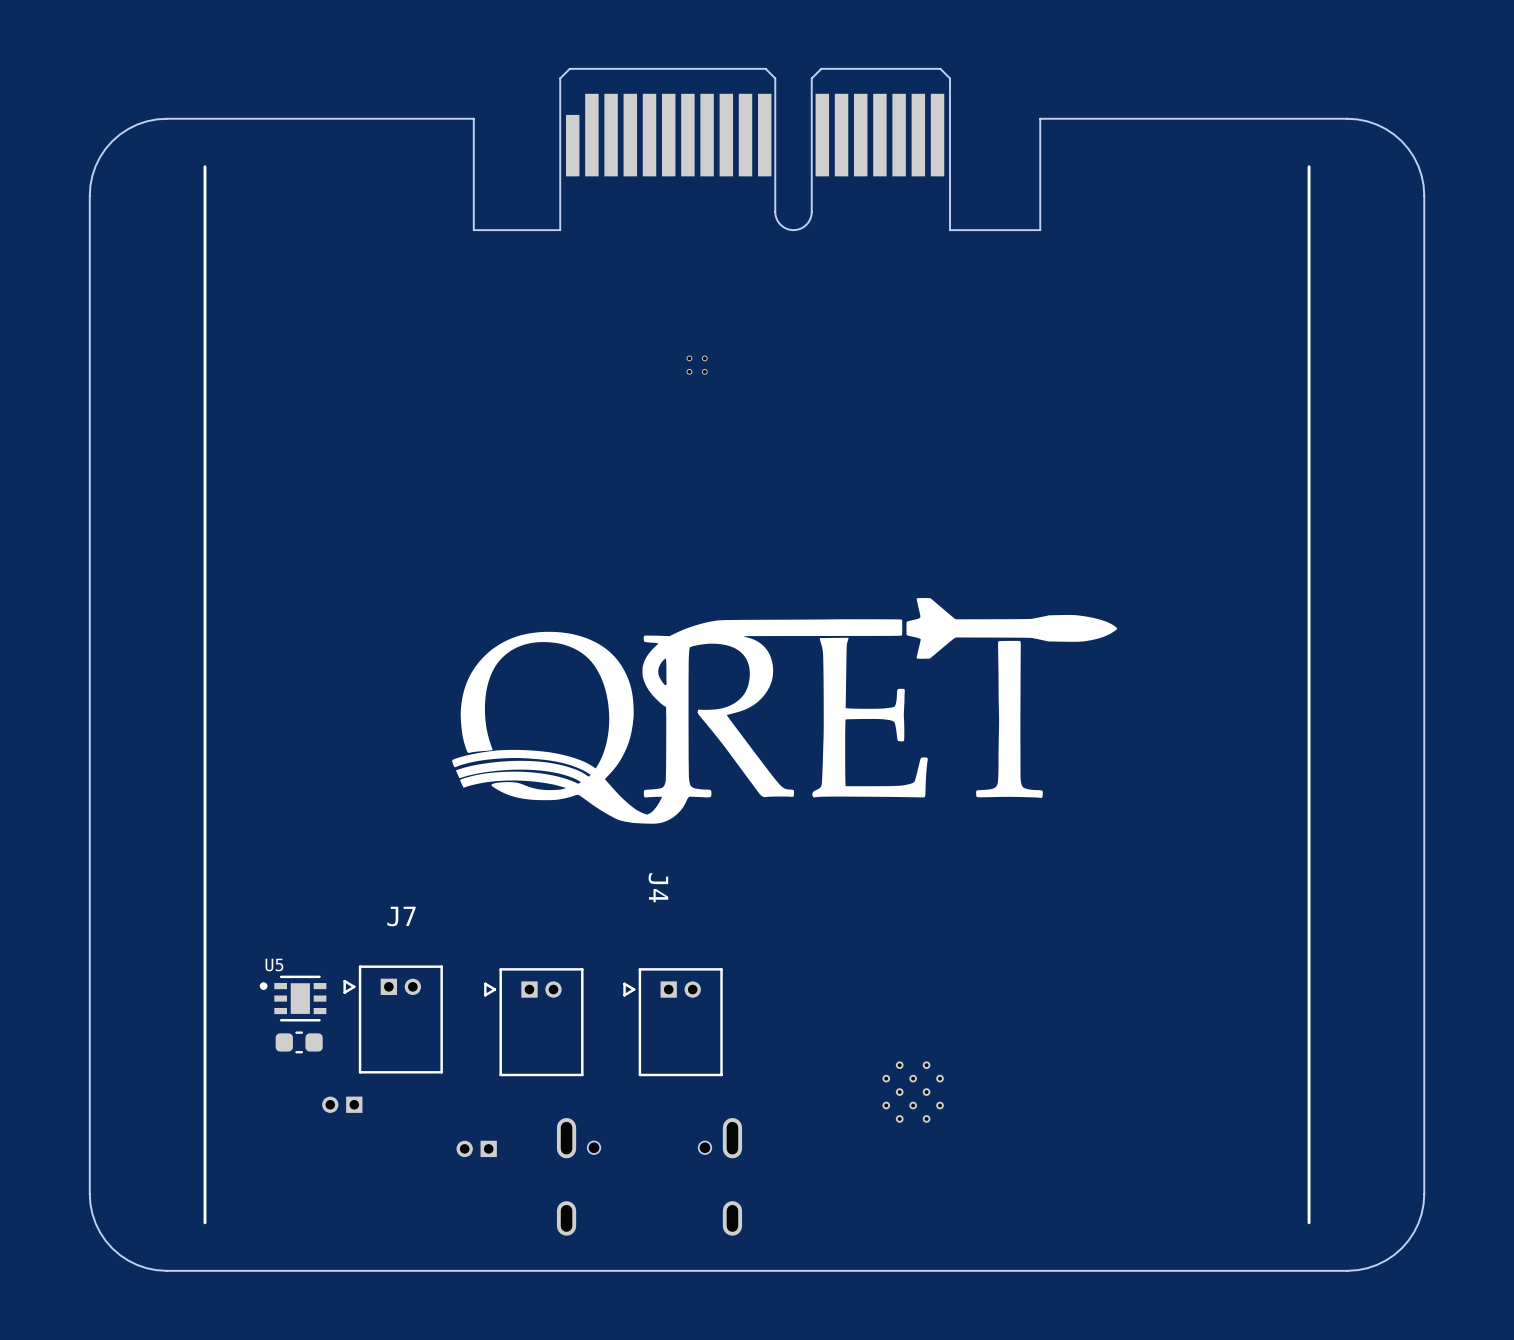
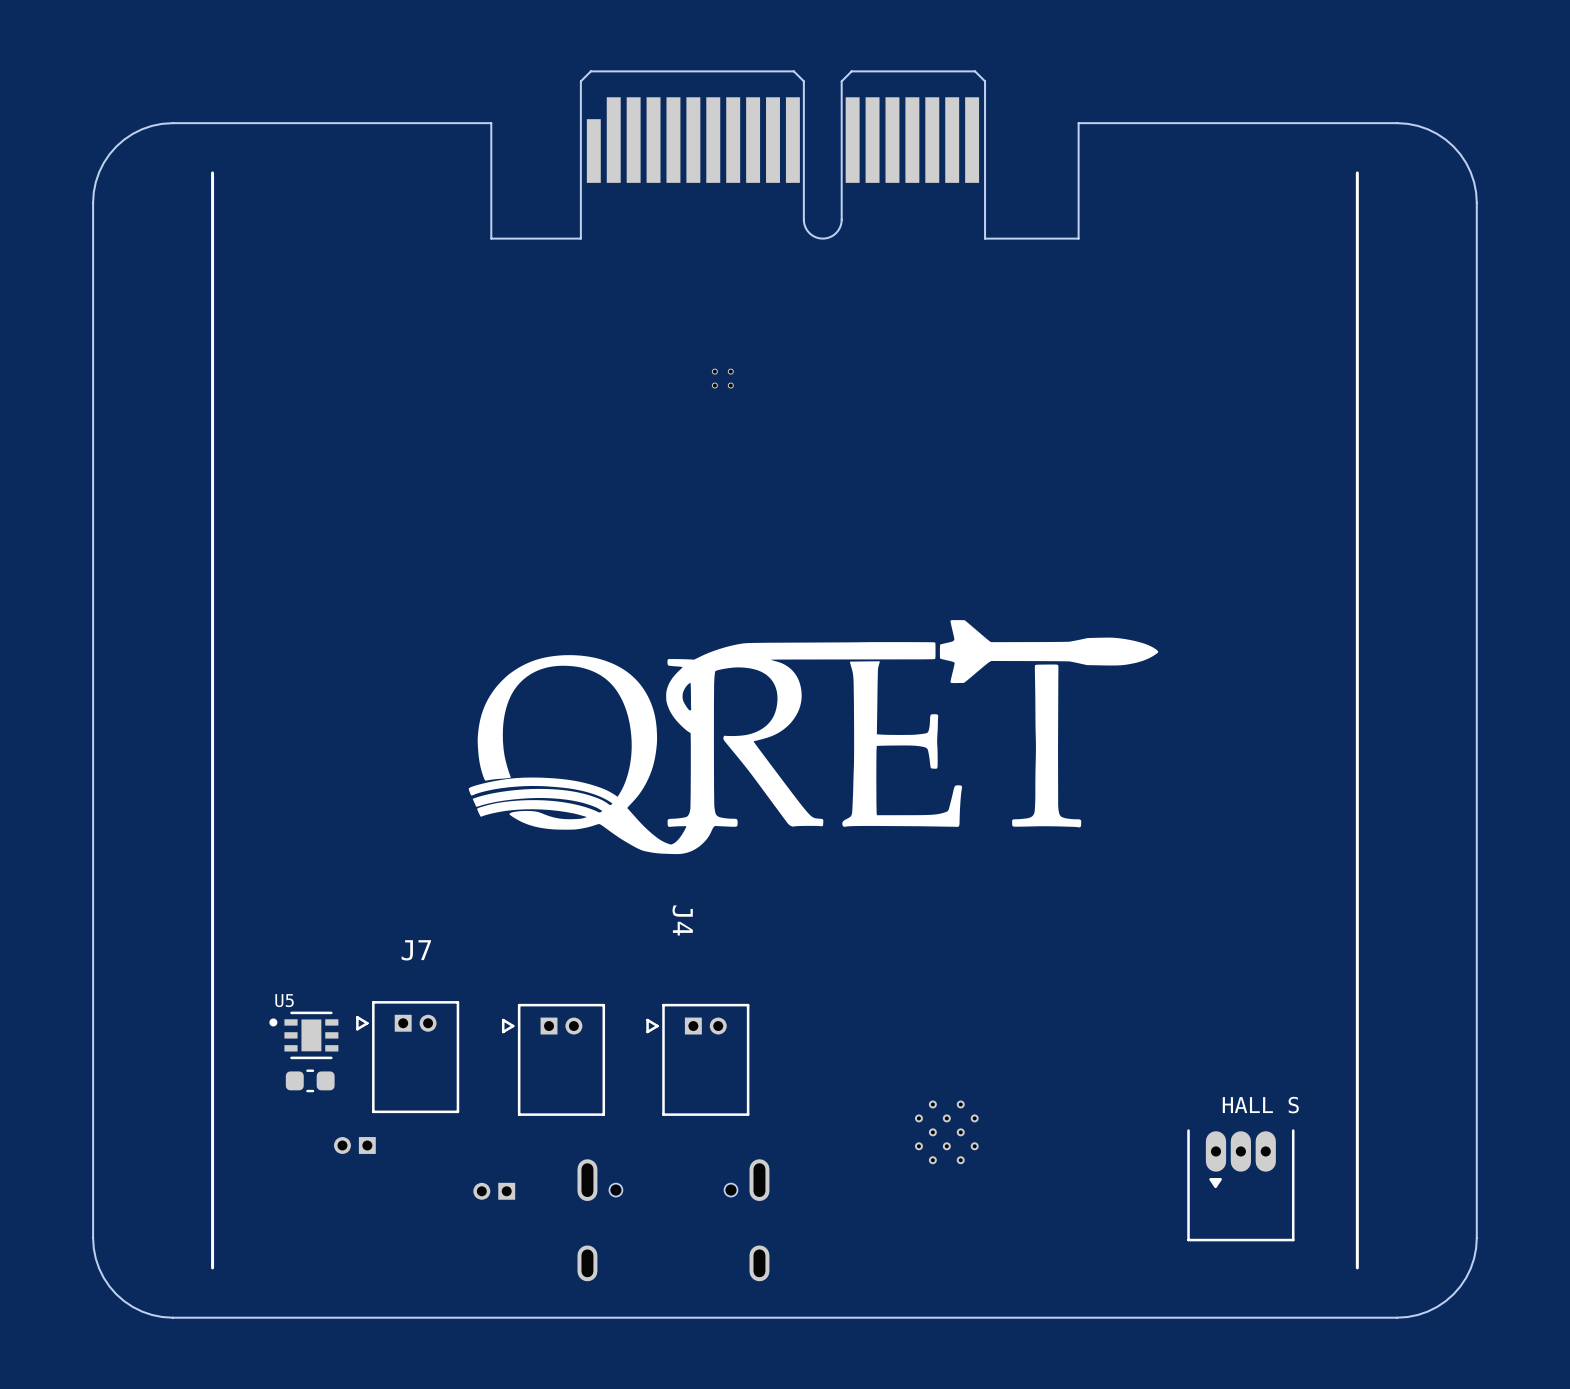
HALL S: none -> (1240, 1185)

